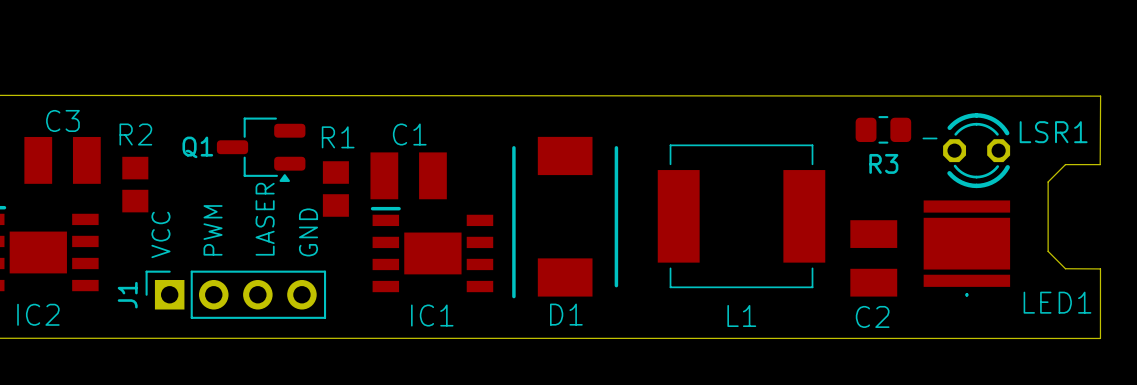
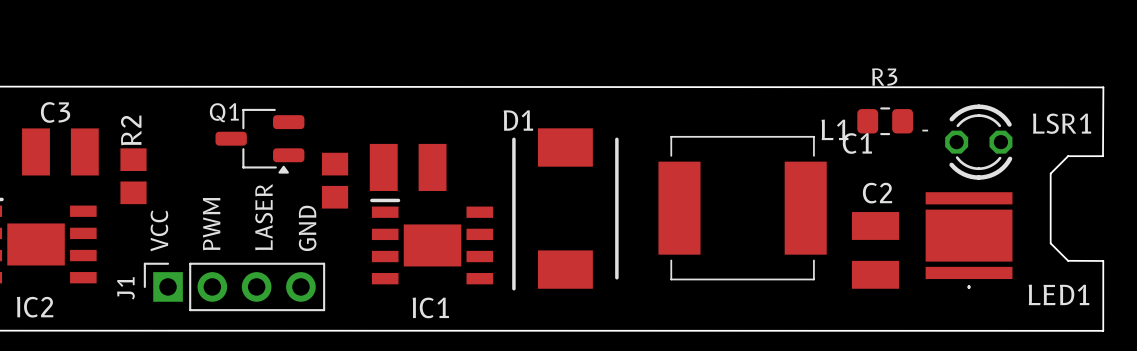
R2 name rotation: 0° (135, 134) -> 90° counterclockwise (131, 130)
C1 name position: C1 (409, 134) -> C1 (857, 143)
R1 name: R1 (338, 137) -> none
Q1 name position: Q1 (197, 147) -> Q1 (224, 112)
R3 name position: R3 (883, 163) -> R3 (884, 77)
D1 name position: D1 (566, 314) -> D1 (518, 120)
L1 name position: L1 (741, 315) -> L1 (835, 129)
C2 name position: C2 (872, 316) -> C2 (877, 193)

